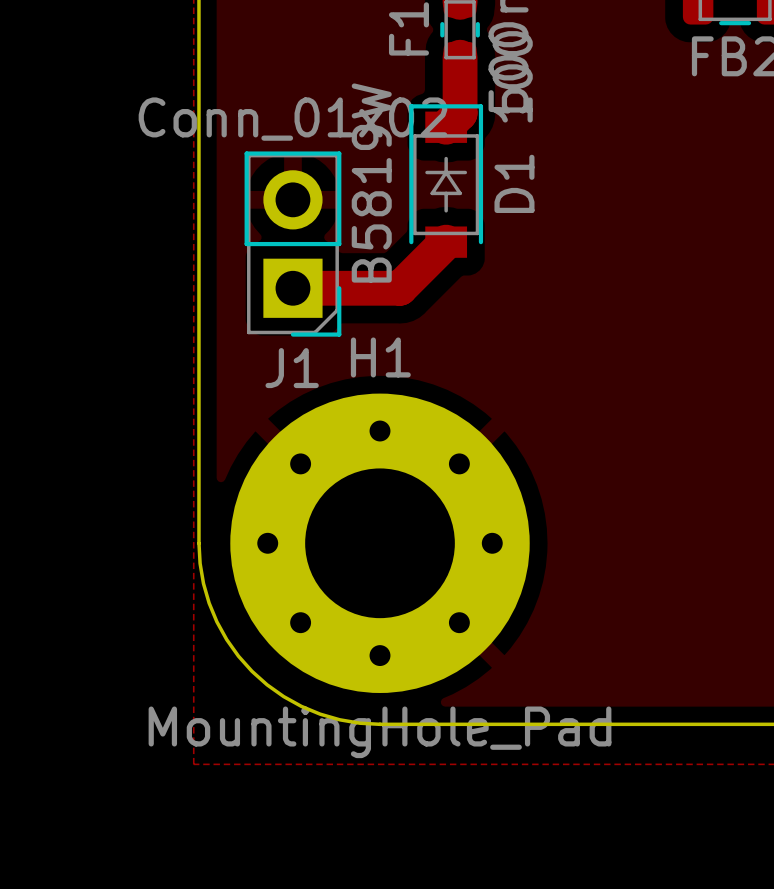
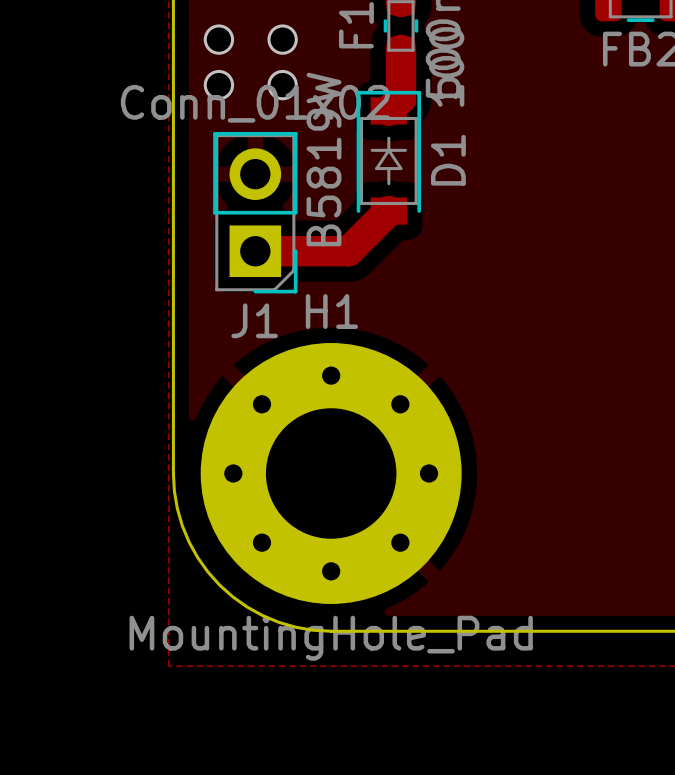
via: none -> (218, 39)
via: none -> (282, 39)
via: none -> (218, 85)
via: none -> (282, 85)

